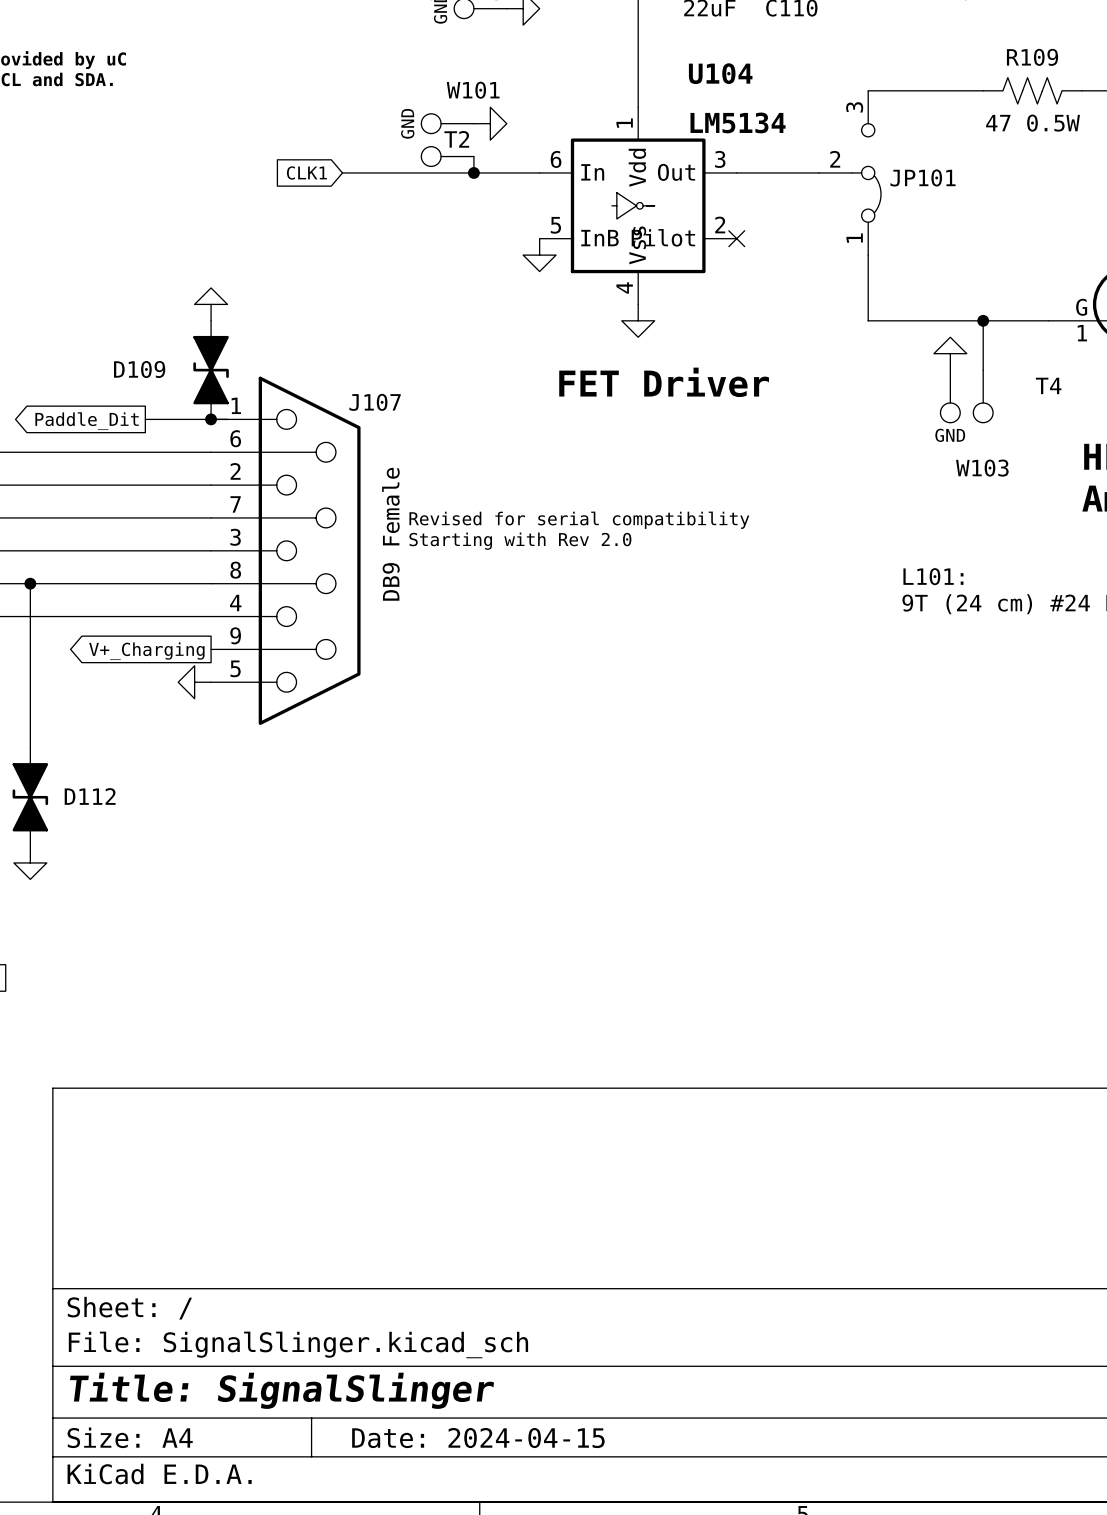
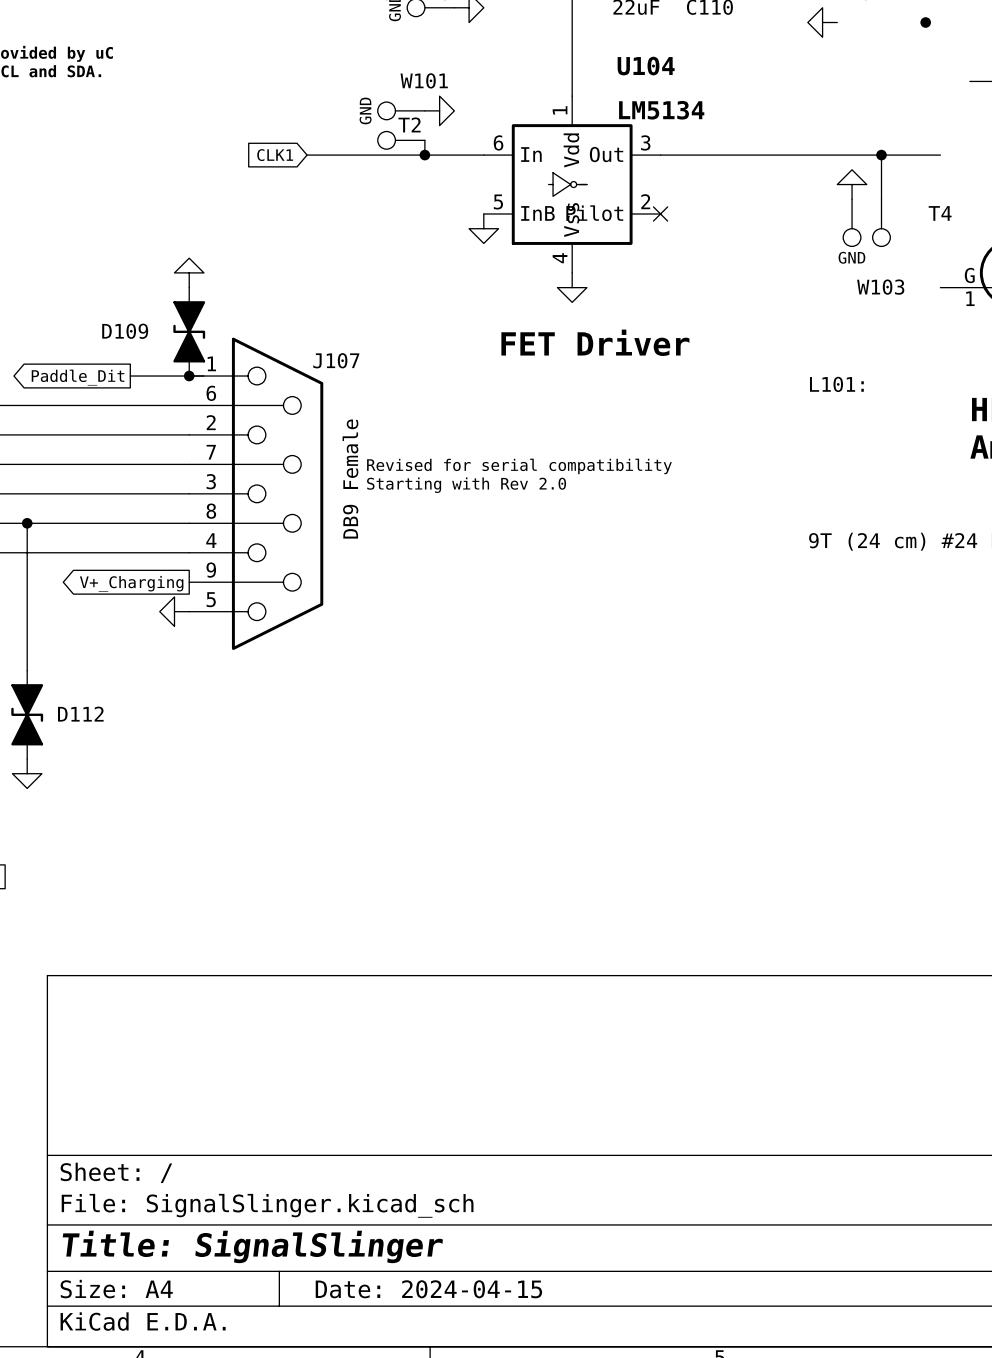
power symbol: none -> (822, 22)
junction: none -> (925, 22)
wire: (868, 90) (983, 90) -> none
R109: 47 0.5W (1032, 90) -> none
wire: none -> (734, 155) (940, 155)
JP101: (849, 172) -> none
junction: none -> (881, 155)
power symbol: none -> (852, 184)
wire: (868, 255) (868, 320) (1048, 320) -> none
wire: (983, 320) (983, 370) -> (881, 155) (881, 199)
junction: (983, 320) -> none
power symbol: (950, 353) -> none
W103 position: (966, 396) -> (866, 222)
text position: L101: (933, 576) -> L101: (836, 384)

